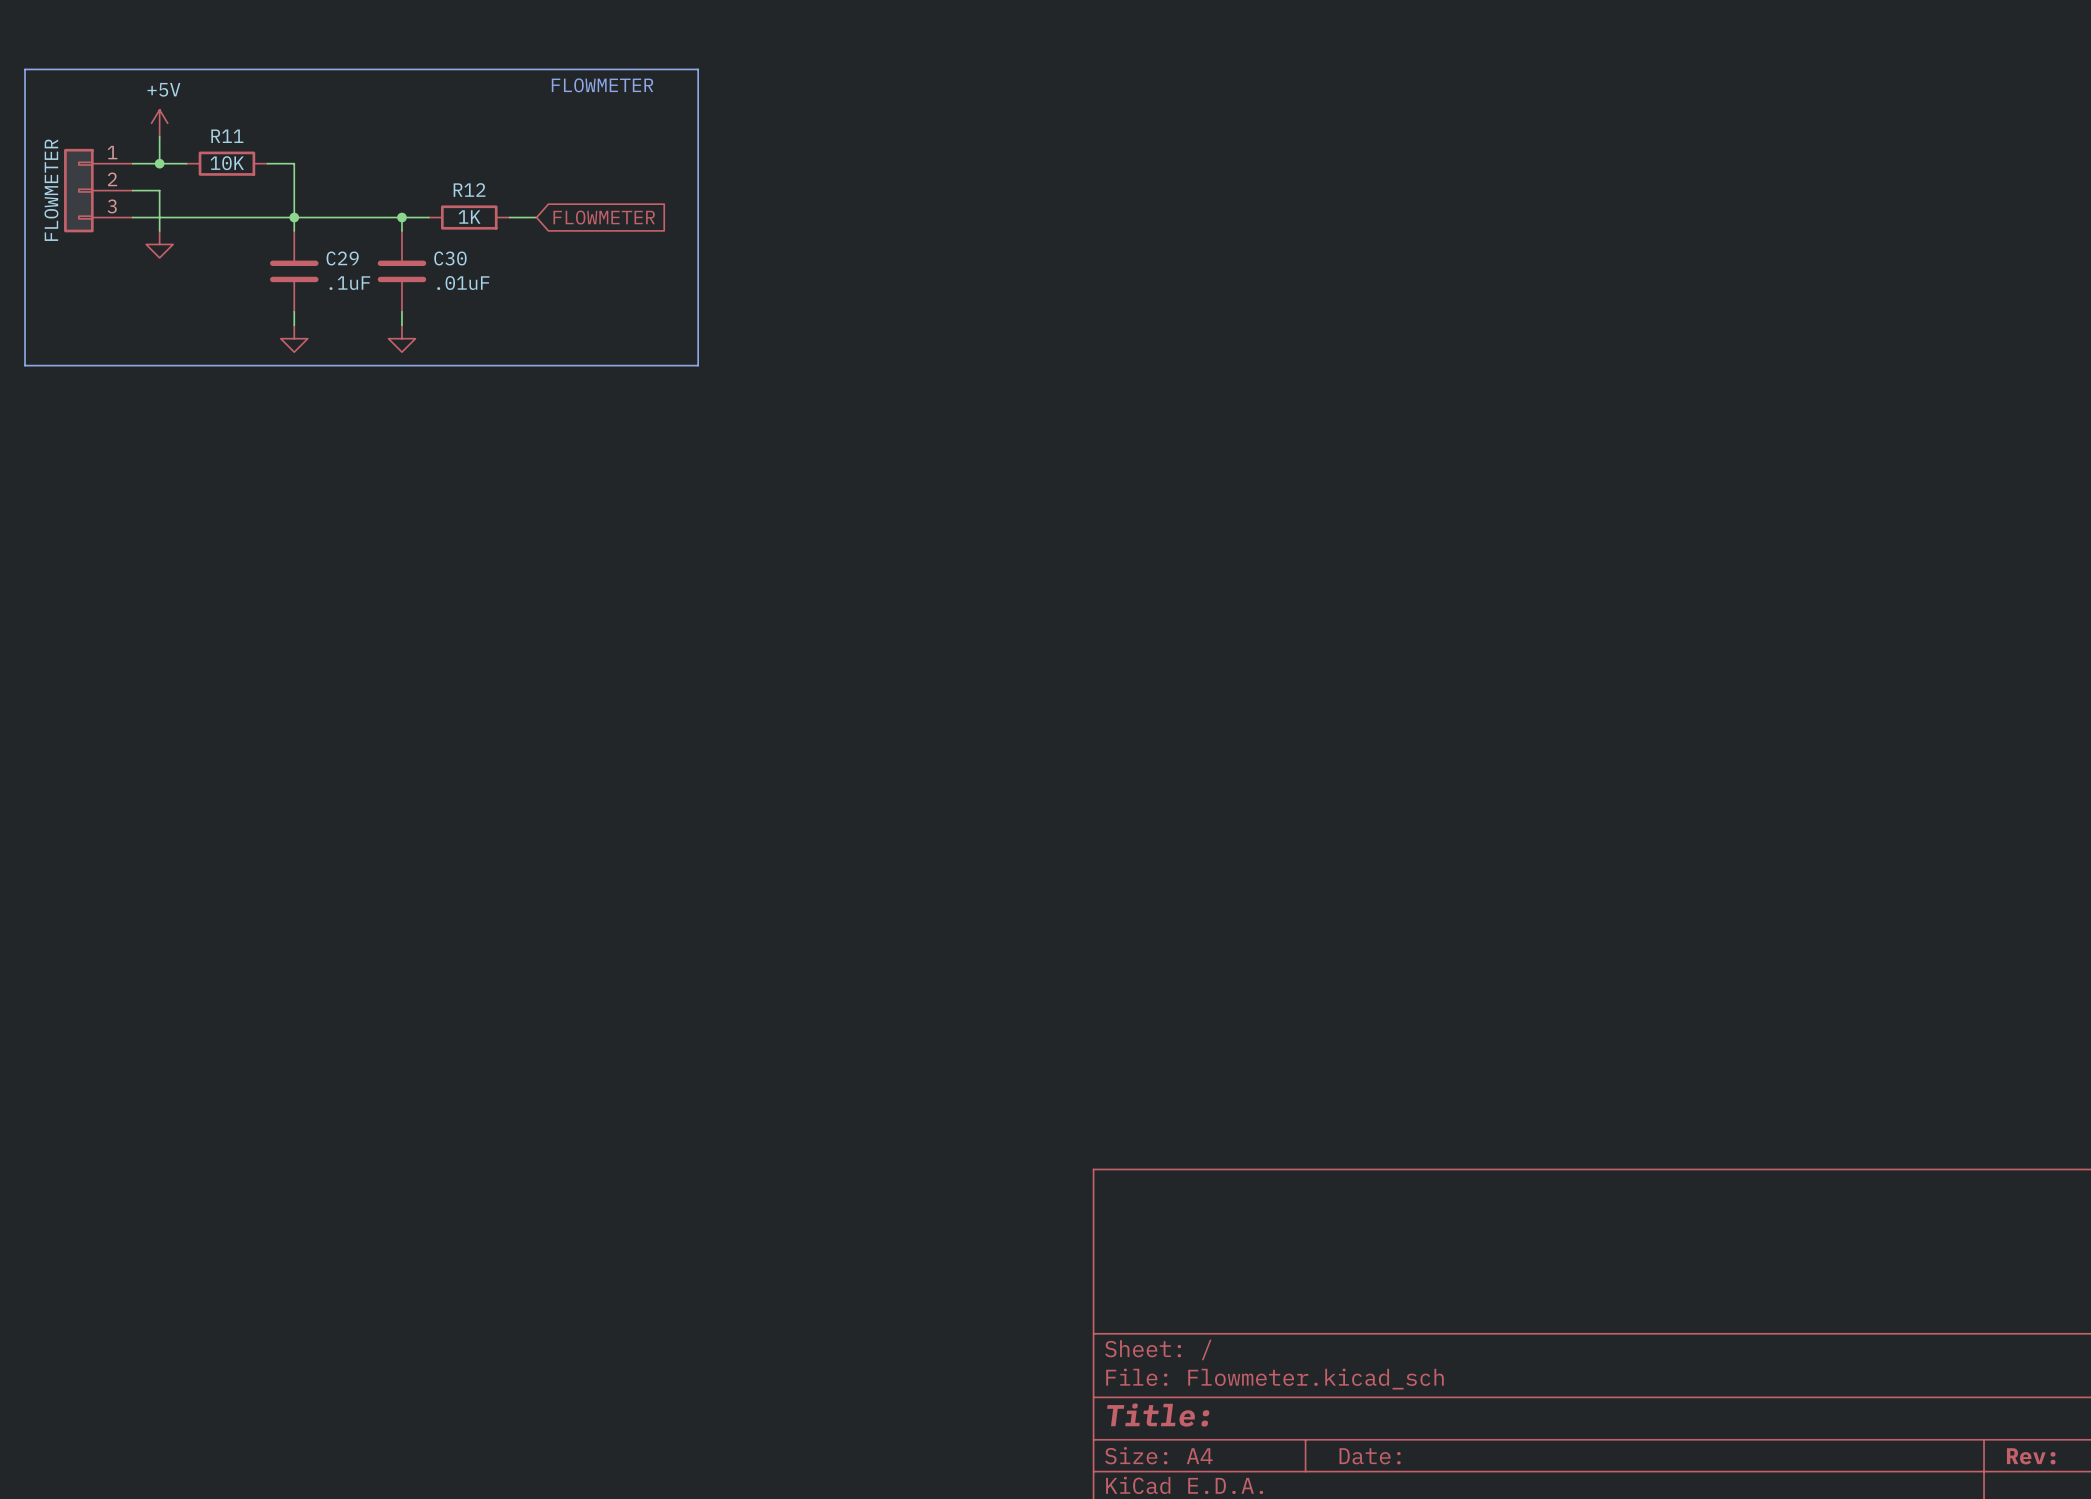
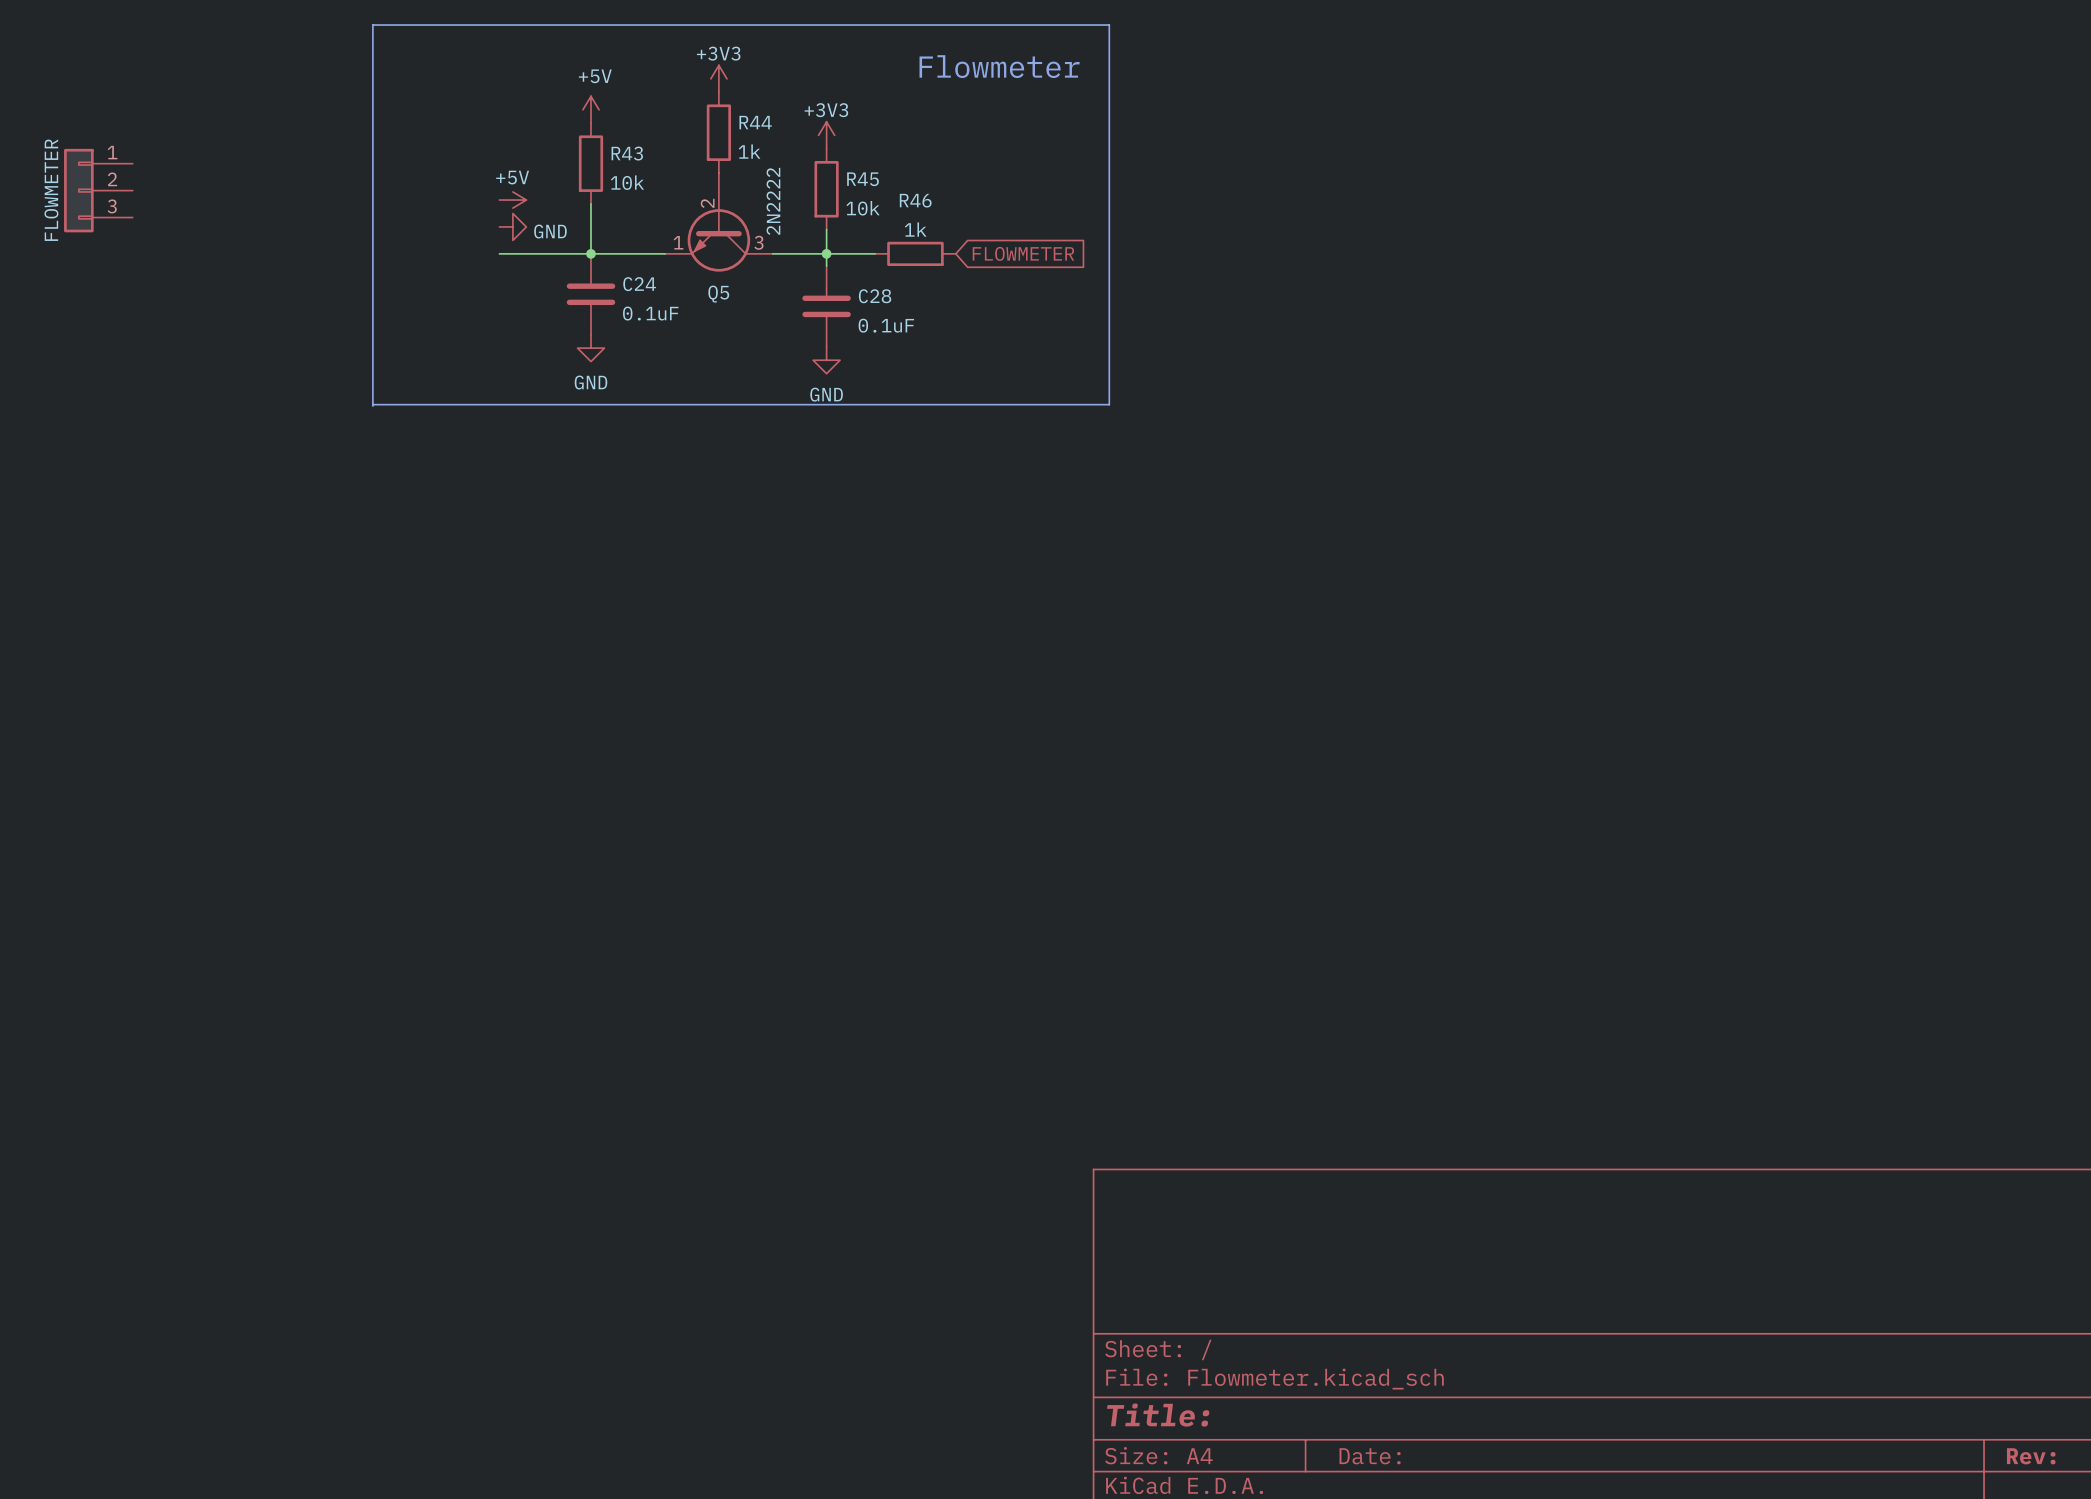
text: none -> Flowmeter (999, 66)
line: (25, 69) (25, 365) (698, 365) (698, 69) (25, 69) -> none
power symbol: none -> +3V3 (718, 78)
text: FLOWMETER (602, 85) -> none
power symbol: none -> +5V (590, 109)
power symbol: +5V (159, 123) -> none
R44: none -> 1k (718, 132)
power symbol: none -> +3V3 (826, 135)
wire: (159, 136) (159, 163) -> none
wire: (132, 163) (186, 163) -> none
junction: (159, 163) -> none
R11: 10K (226, 163) -> none
wire: (267, 163) (294, 163) (294, 230) -> none
R43: none -> 10k (590, 163)
R45: none -> 10k (826, 189)
wire: (132, 190) (159, 190) (159, 230) -> none
power symbol: none -> +5V (512, 200)
wire: none -> (590, 204) (590, 253)
wire: (132, 217) (428, 217) -> none
junction: (294, 217) -> none
wire: (401, 217) (401, 230) -> none
junction: (401, 217) -> none
R12: 1K (469, 217) -> none
wire: (509, 217) (536, 217) -> none
global label: FLOWMETER (604, 217) -> none
Q5: none -> 2N2222 (718, 222)
power symbol: none -> GND (512, 226)
wire: none -> (826, 229) (826, 265)
power symbol: (159, 244) -> none
wire: none -> (499, 253) (665, 253)
junction: none -> (590, 253)
wire: none -> (772, 253) (875, 253)
junction: none -> (826, 253)
R46: none -> 1k (915, 253)
global label: none -> FLOWMETER (1023, 253)
C29: .1uF (294, 271) -> none
C30: .01uF (401, 271) -> none
C24: none -> 0.1uF (590, 294)
C28: none -> 0.1uF (826, 306)
wire: (294, 311) (294, 325) -> none
wire: (401, 311) (401, 325) -> none
power symbol: (294, 338) -> none
power symbol: (401, 338) -> none
power symbol: none -> GND (590, 348)
power symbol: none -> GND (826, 360)
line: none -> (372, 404) (1109, 404) (1109, 25) (372, 25) (372, 406)

